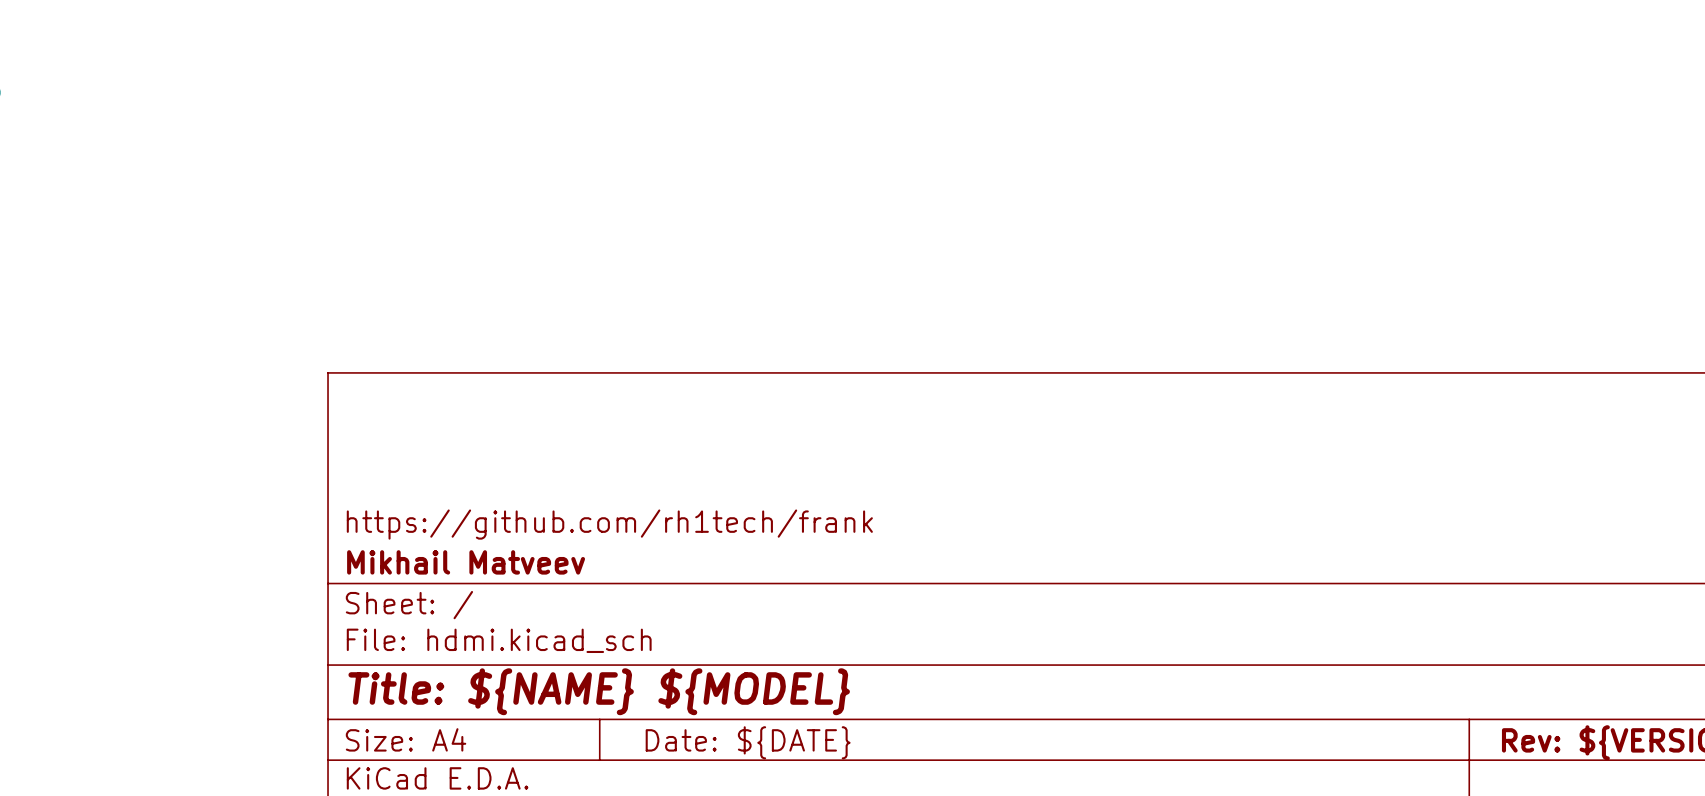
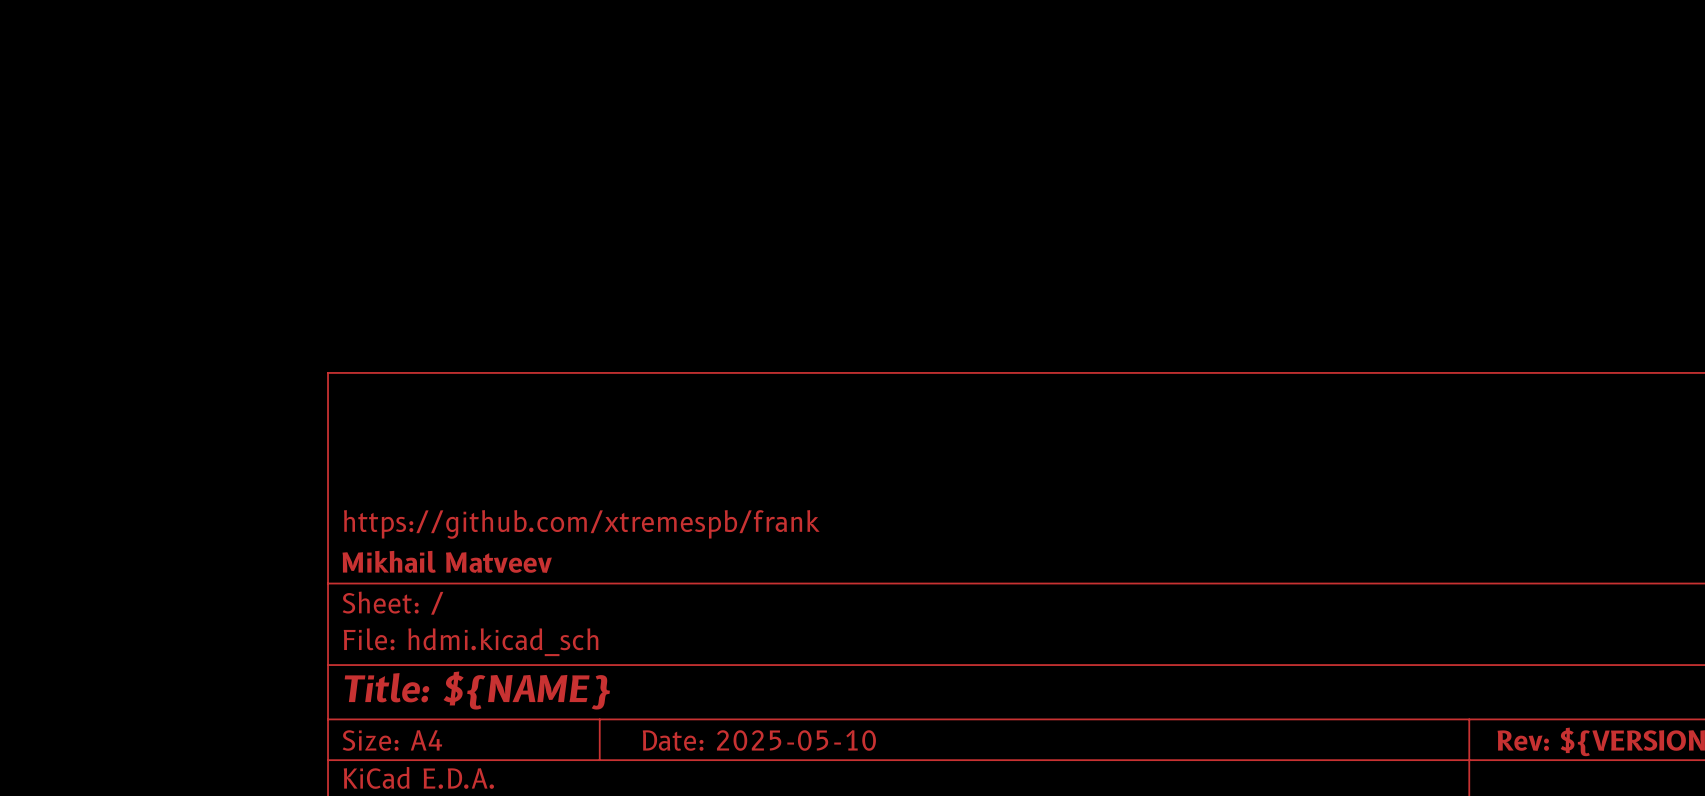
title block: https://github.com/rh1tech/frank (609, 524) -> https://github.com/xtremespb/frank (581, 524)
title block: Title: ${NAME} ${MODEL} (599, 691) -> Title: ${NAME} (477, 690)
title block: Date: ${DATE} (748, 742) -> Date: 2025-05-10 (759, 740)

